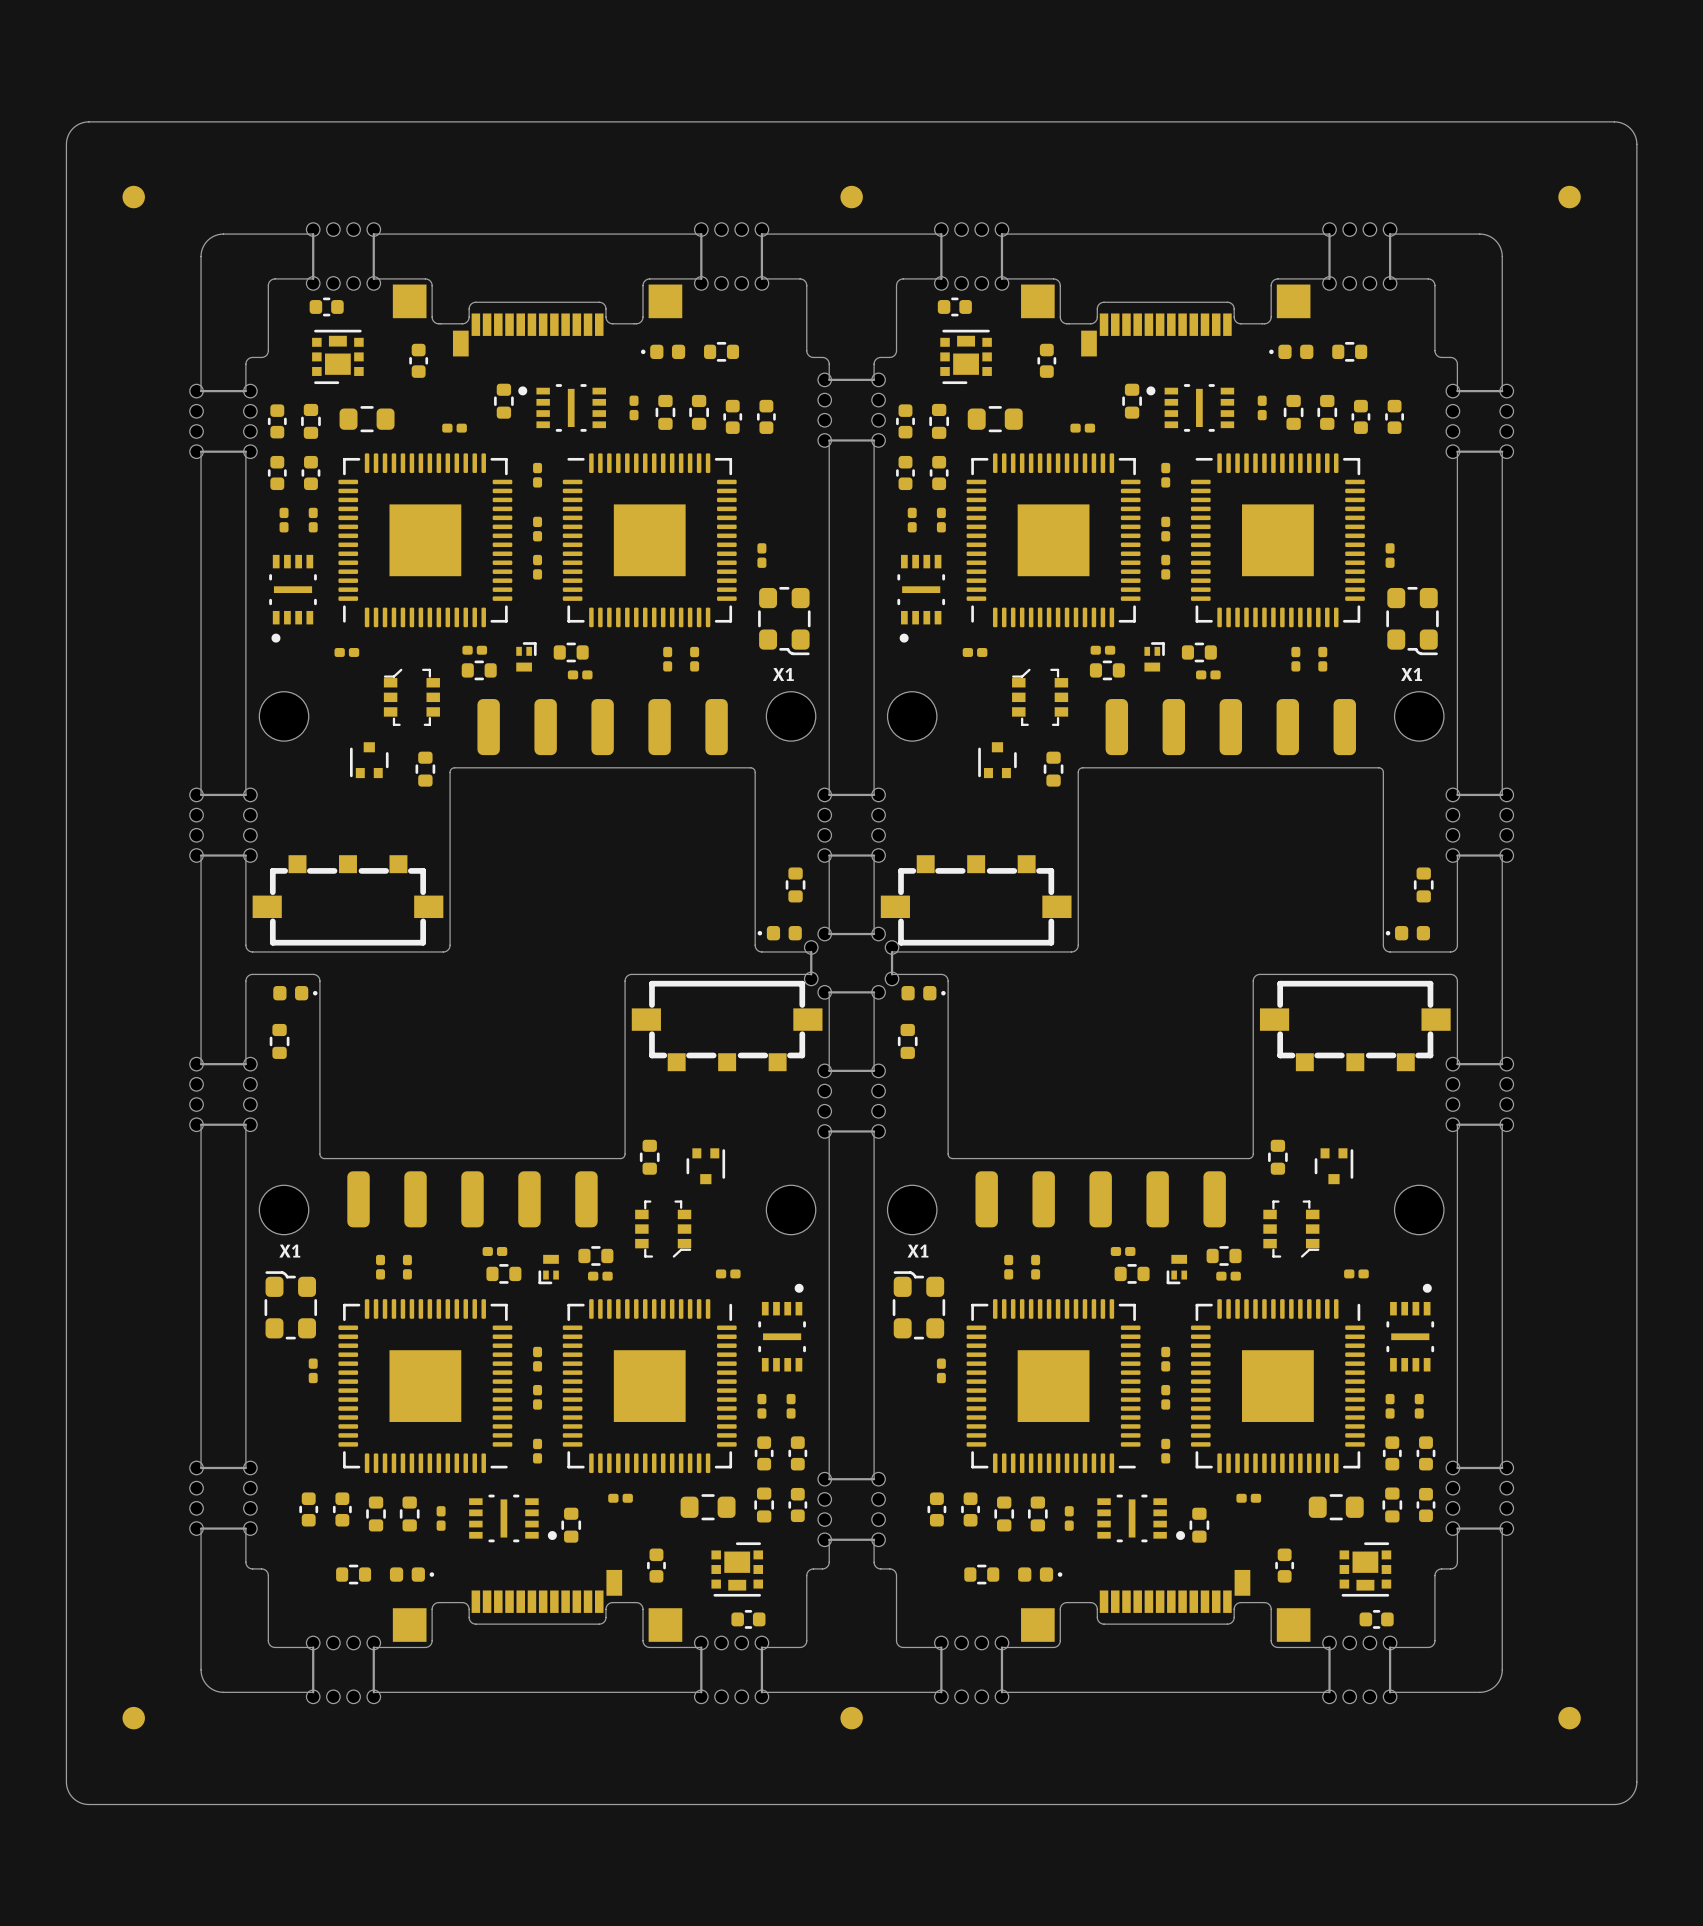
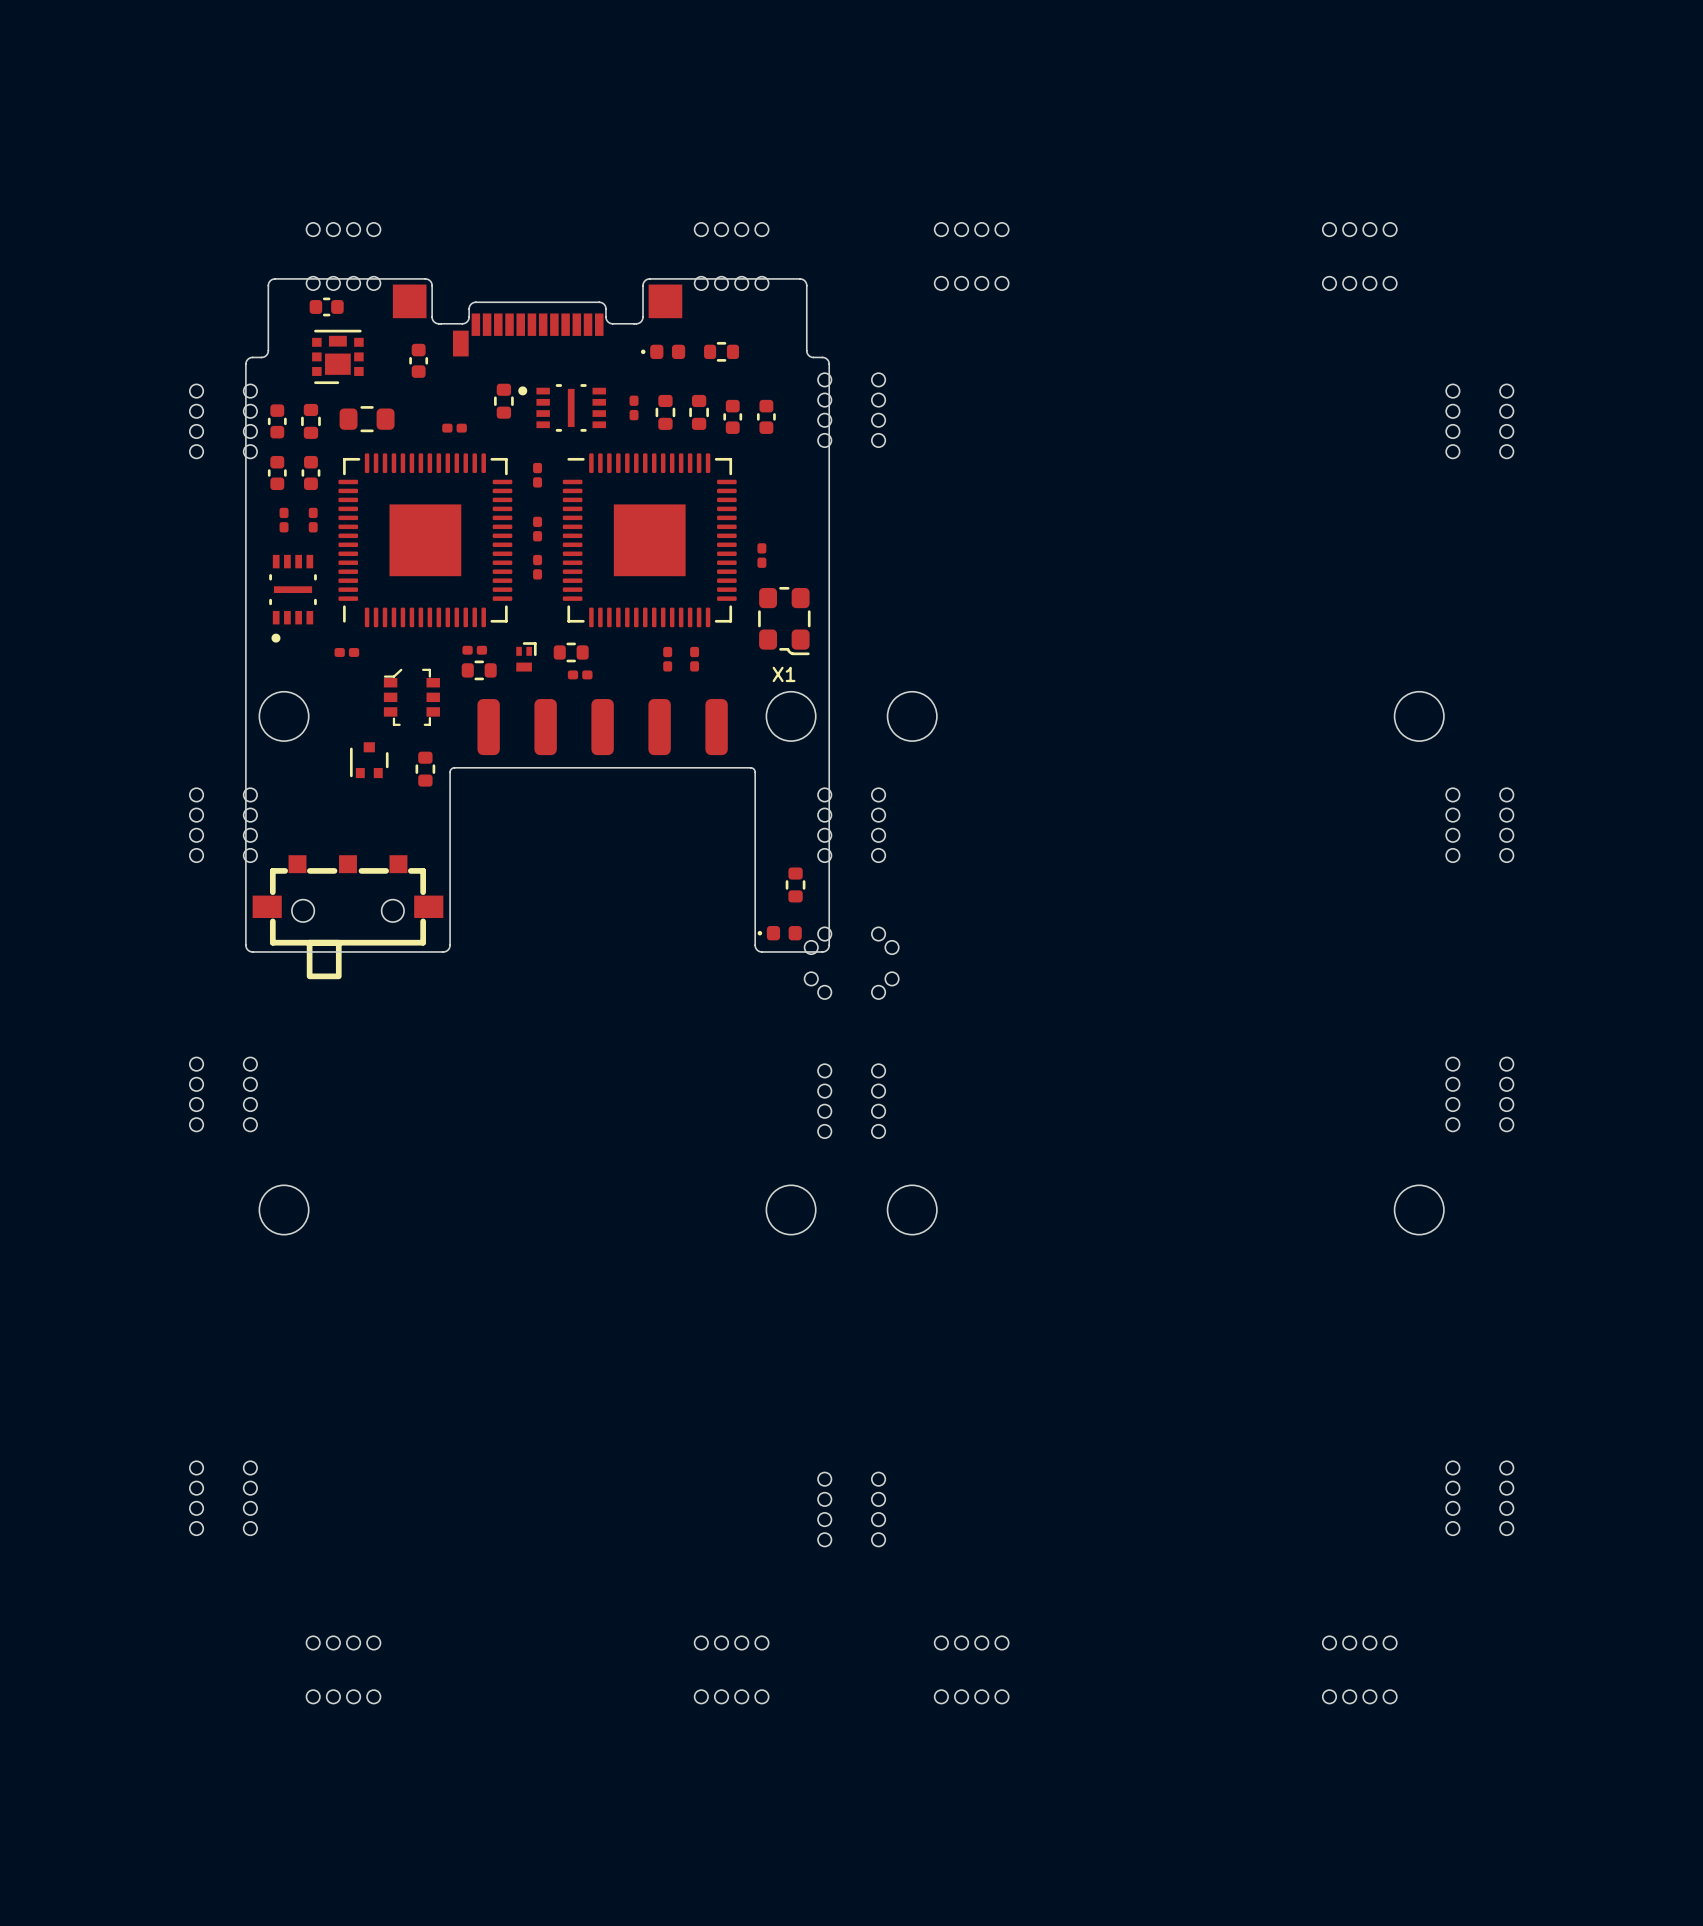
board edge: (88, 121) (1614, 121) (1624, 124) (1630, 128) (1635, 136) (1636, 144) (1636, 1782) (1635, 1789) (1630, 1797) (1621, 1803) (1614, 1804) (88, 1804) (79, 1802) (72, 1797) (68, 1791) (66, 1782) (66, 144) (67, 136) (72, 128) (79, 124) (88, 121) -> none
part: (133, 197) -> none
part: (851, 197) -> none
part: (1569, 197) -> none
board edge: (1390, 234) (1482, 234) (1489, 236) (1497, 242) (1502, 256) (1502, 391) (1457, 391) (1456, 360) (1452, 357) (1439, 356) (1435, 352) (1434, 283) (1429, 278) (1390, 278) (1390, 234) -> none
board edge: (313, 278) (313, 234) (220, 234) (211, 237) (204, 244) (201, 256) (201, 391) (245, 391) -> (313, 278) (373, 278)
board edge: (373, 278) (373, 234) (701, 234) (701, 278) -> none
board edge: (761, 278) (761, 234) (941, 234) (941, 278) (902, 278) (897, 283) (895, 354) (875, 360) (874, 379) (829, 379) -> (761, 278) (701, 278)
part: (1037, 301) -> none
part: (1293, 301) -> none
part: (954, 306) -> none
board edge: (1069, 323) (1063, 322) (1060, 318) (1060, 284) (1056, 279) (1001, 278) (1001, 234) (1329, 234) (1329, 278) (1274, 279) (1271, 284) (1270, 318) (1267, 322) (1262, 323) -> none
part: (1165, 329) -> none
part: (1291, 351) -> none
part: (1349, 351) -> none
part: (966, 356) -> none
part: (1046, 360) -> none
part: (1132, 401) -> none
part: (1190, 407) -> none
part: (1262, 407) -> none
part: (1293, 412) -> none
part: (1327, 412) -> none
part: (1360, 416) -> none
part: (1394, 416) -> none
part: (995, 419) -> none
part: (905, 421) -> none
part: (939, 421) -> none
part: (1082, 428) -> none
board edge: (829, 440) (874, 440) (874, 794) (829, 794) -> (829, 440) (829, 379)
board edge: (245, 451) (201, 451) (201, 794) (245, 794) -> (245, 451) (245, 391)
board edge: (1457, 451) (1457, 794) (1502, 794) (1502, 451) (1457, 451) -> none
part: (905, 472) -> none
part: (939, 472) -> none
part: (1165, 475) -> none
part: (912, 520) -> none
part: (941, 520) -> none
part: (1165, 529) -> none
part: (1053, 540) -> none
part: (1277, 540) -> none
part: (1390, 555) -> none
part: (1165, 567) -> none
part: (921, 598) -> none
X1: (1412, 621) -> none
part: (1102, 650) -> none
part: (975, 652) -> none
part: (1199, 652) -> none
part: (1154, 656) -> none
part: (1295, 659) -> none
part: (1322, 659) -> none
part: (1107, 670) -> none
part: (1208, 674) -> none
part: (1040, 697) -> none
part: (1230, 727) -> none
part: (997, 760) -> none
part: (1053, 769) -> none
board edge: (1078, 772) (1082, 767) (1378, 767) (1383, 772) -> none
board edge: (1078, 772) (1078, 945) (1076, 950) (1071, 951) (892, 951) (892, 974) (942, 974) (947, 979) (948, 1153) -> none
board edge: (1383, 772) (1383, 945) (1385, 950) (1454, 950) (1457, 945) (1457, 855) (1502, 855) (1502, 1064) (1457, 1064) (1457, 981) (1453, 974) (1257, 974) (1253, 981) (1253, 1153) -> none
board edge: none -> (829, 794) (829, 855)
board edge: (245, 855) (201, 855) (201, 1064) (245, 1064) (245, 981) (248, 975) (317, 975) (319, 981) (319, 1153) -> (245, 855) (245, 794)
part footprint: [252, 855, 444, 946] -> [252, 855, 444, 980]
board edge: (829, 855) (874, 855) (874, 934) (829, 934) -> (811, 951) (827, 950) (829, 934)
part: (1423, 884) -> none
part: (976, 900) -> none
part: (1407, 933) -> none
board edge: (811, 951) (811, 974) (631, 974) (627, 976) (625, 981) (625, 1153) -> none
board edge: (829, 992) (829, 1070) (874, 1070) (874, 992) (829, 992) -> none
part: (295, 993) -> none
part: (923, 993) -> none
part: (727, 1026) -> none
part: (1355, 1026) -> none
part: (279, 1041) -> none
part: (907, 1041) -> none
board edge: (201, 1124) (201, 1467) (245, 1467) (245, 1124) (201, 1124) -> none
board edge: (1457, 1124) (1457, 1467) (1502, 1467) (1502, 1124) (1457, 1124) -> none
board edge: (829, 1131) (829, 1479) (874, 1479) (874, 1131) (829, 1131) -> none
board edge: (319, 1154) (324, 1158) (620, 1158) (625, 1154) -> none
board edge: (948, 1154) (952, 1158) (1248, 1158) (1253, 1154) -> none
part: (649, 1157) -> none
part: (1277, 1157) -> none
part: (705, 1166) -> none
part: (1334, 1166) -> none
part: (472, 1199) -> none
part: (1100, 1199) -> none
part: (663, 1229) -> none
part: (1291, 1229) -> none
part: (494, 1251) -> none
part: (1123, 1251) -> none
part: (595, 1255) -> none
part: (1224, 1255) -> none
part: (380, 1267) -> none
part: (407, 1267) -> none
part: (1008, 1267) -> none
part: (1035, 1267) -> none
part: (548, 1269) -> none
part: (1176, 1269) -> none
part: (503, 1273) -> none
part: (728, 1273) -> none
part: (1132, 1273) -> none
part: (1356, 1273) -> none
part: (600, 1276) -> none
part: (1228, 1276) -> none
X1: (290, 1305) -> none
X1: (918, 1305) -> none
part: (782, 1327) -> none
part: (1410, 1327) -> none
part: (537, 1359) -> none
part: (1165, 1359) -> none
part: (313, 1370) -> none
part: (941, 1370) -> none
part: (425, 1386) -> none
part: (649, 1386) -> none
part: (1053, 1386) -> none
part: (1277, 1386) -> none
part: (537, 1397) -> none
part: (1165, 1397) -> none
part: (761, 1406) -> none
part: (791, 1406) -> none
part: (1390, 1406) -> none
part: (1419, 1406) -> none
part: (537, 1451) -> none
part: (1165, 1451) -> none
part: (764, 1453) -> none
part: (797, 1453) -> none
part: (1392, 1453) -> none
part: (1425, 1453) -> none
part: (620, 1498) -> none
part: (1248, 1498) -> none
part: (764, 1505) -> none
part: (797, 1505) -> none
part: (1392, 1505) -> none
part: (1425, 1505) -> none
part: (708, 1507) -> none
part: (1336, 1507) -> none
part: (308, 1509) -> none
part: (342, 1509) -> none
part: (936, 1509) -> none
part: (970, 1509) -> none
part: (376, 1513) -> none
part: (409, 1513) -> none
part: (1004, 1513) -> none
part: (1037, 1513) -> none
part: (441, 1518) -> none
part: (512, 1518) -> none
part: (1069, 1518) -> none
part: (1141, 1518) -> none
part: (571, 1525) -> none
part: (1199, 1525) -> none
board edge: (201, 1528) (201, 1669) (204, 1681) (211, 1688) (220, 1692) (313, 1692) (313, 1647) (274, 1647) (268, 1643) (268, 1573) (264, 1569) (250, 1568) (246, 1564) (245, 1528) (201, 1528) -> none
board edge: (1457, 1528) (1456, 1564) (1452, 1568) (1439, 1569) (1435, 1573) (1434, 1643) (1429, 1647) (1390, 1647) (1390, 1692) (1482, 1692) (1493, 1687) (1501, 1677) (1502, 1528) (1457, 1528) -> none
board edge: (829, 1539) (828, 1565) (824, 1568) (810, 1569) (807, 1573) (806, 1643) (800, 1647) (761, 1647) (761, 1692) (941, 1692) (941, 1647) (902, 1647) (897, 1643) (896, 1573) (892, 1569) (879, 1568) (874, 1565) (874, 1539) (829, 1539) -> none
part: (656, 1565) -> none
part: (1284, 1565) -> none
part: (737, 1569) -> none
part: (1365, 1569) -> none
part: (353, 1574) -> none
part: (412, 1574) -> none
part: (981, 1574) -> none
part: (1040, 1574) -> none
part: (537, 1597) -> none
part: (1165, 1597) -> none
board edge: (441, 1602) (435, 1603) (432, 1607) (432, 1641) (428, 1646) (373, 1647) (373, 1692) (701, 1692) (701, 1647) (646, 1646) (643, 1641) (642, 1607) (639, 1603) (634, 1602) -> none
board edge: (1069, 1602) (1063, 1603) (1060, 1607) (1060, 1641) (1056, 1646) (1001, 1647) (1001, 1692) (1329, 1692) (1329, 1647) (1274, 1646) (1271, 1641) (1270, 1607) (1267, 1603) (1262, 1602) -> none
part: (748, 1619) -> none
part: (1376, 1619) -> none
part: (409, 1625) -> none
part: (665, 1625) -> none
part: (1037, 1625) -> none
part: (1293, 1625) -> none
part: (133, 1718) -> none
part: (851, 1718) -> none
part: (1569, 1718) -> none

